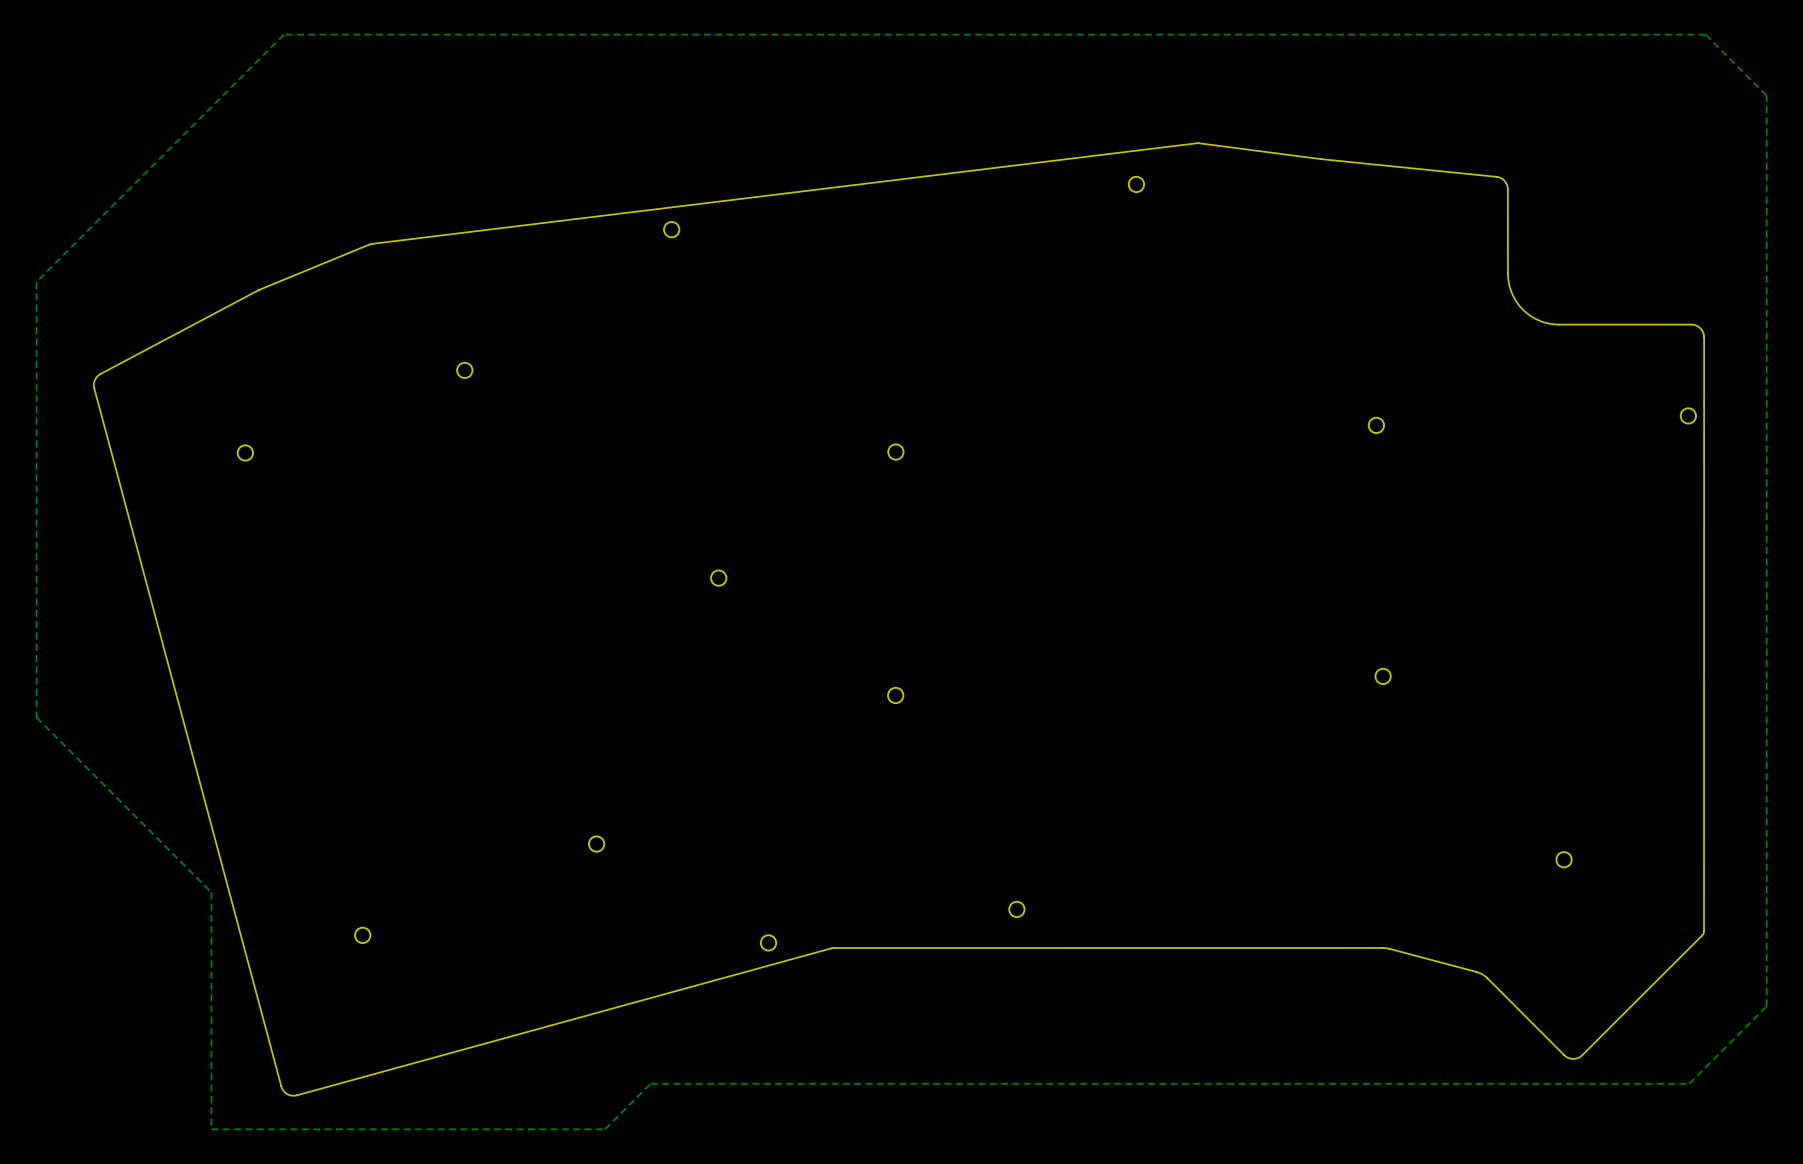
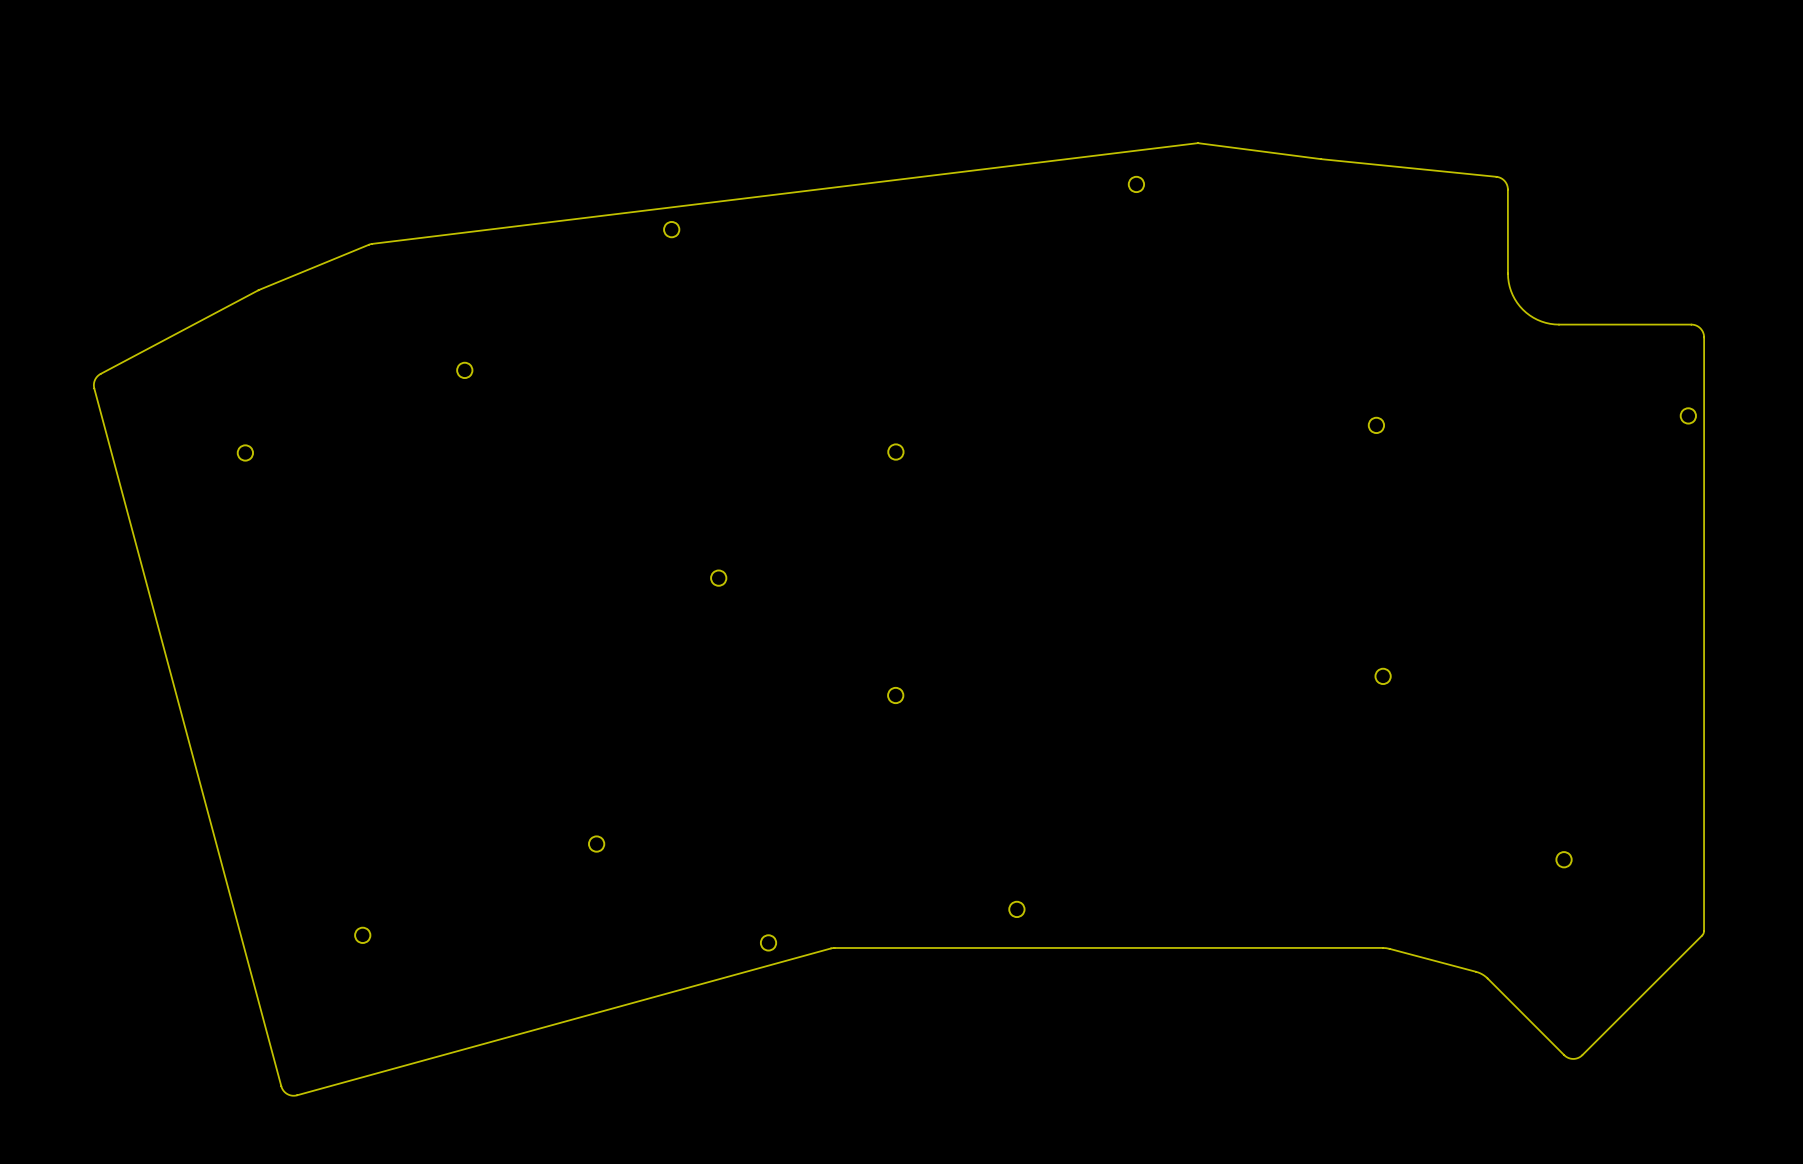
zone outline: (1705, 34) (283, 34) (36, 281) (36, 717) (211, 892) (211, 1129) (605, 1129) (650, 1083) (1689, 1083) (1766, 1006) (1766, 95) (1705, 34) -> none

